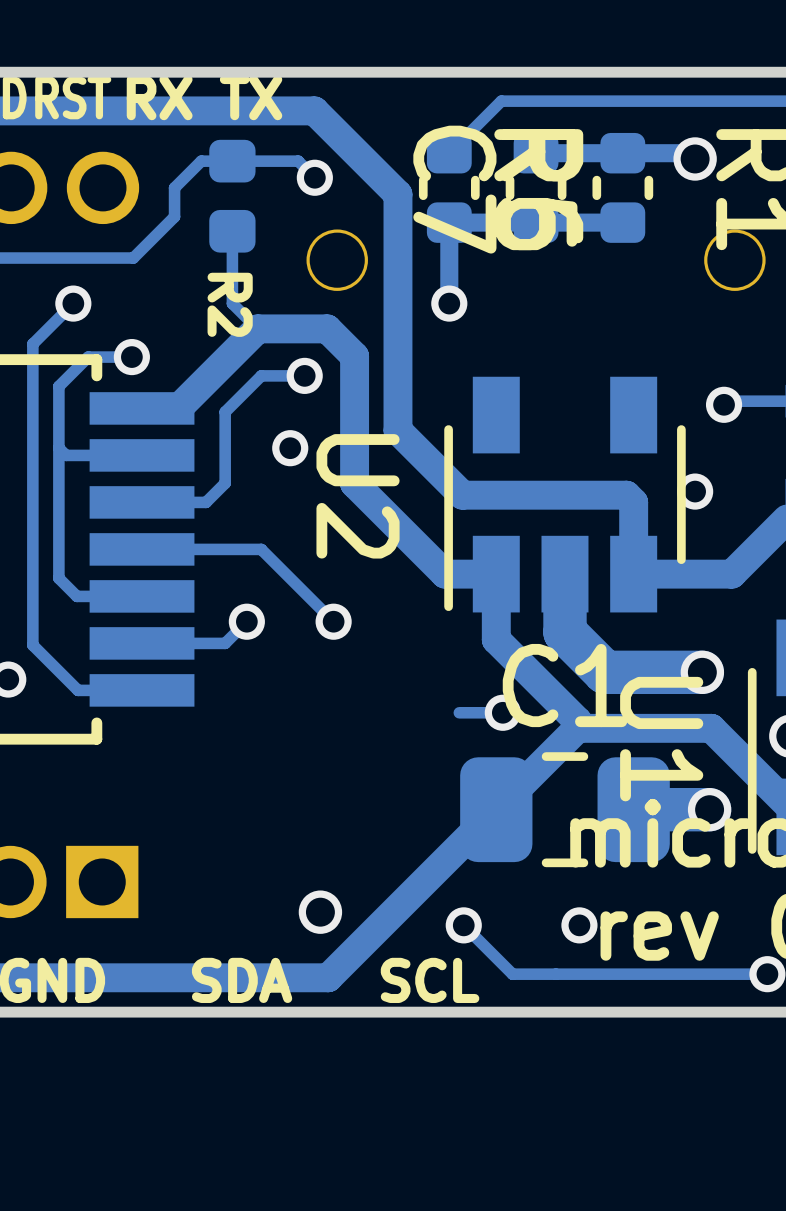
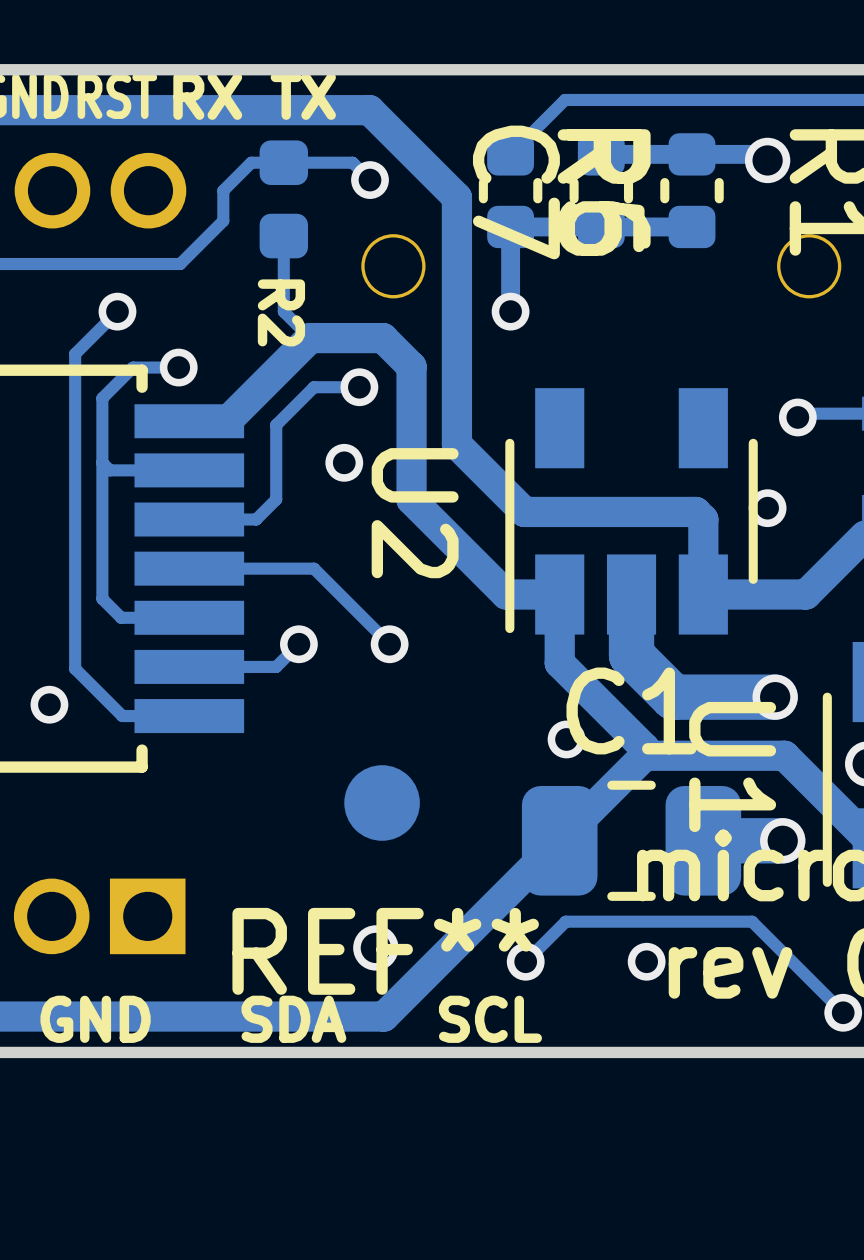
track: (502, 712) (459, 712) -> none
REF**: none -> (382, 802)
track: (463, 925) (512, 974) (767, 974) -> (525, 961) (565, 921) (752, 921) (843, 1012)

